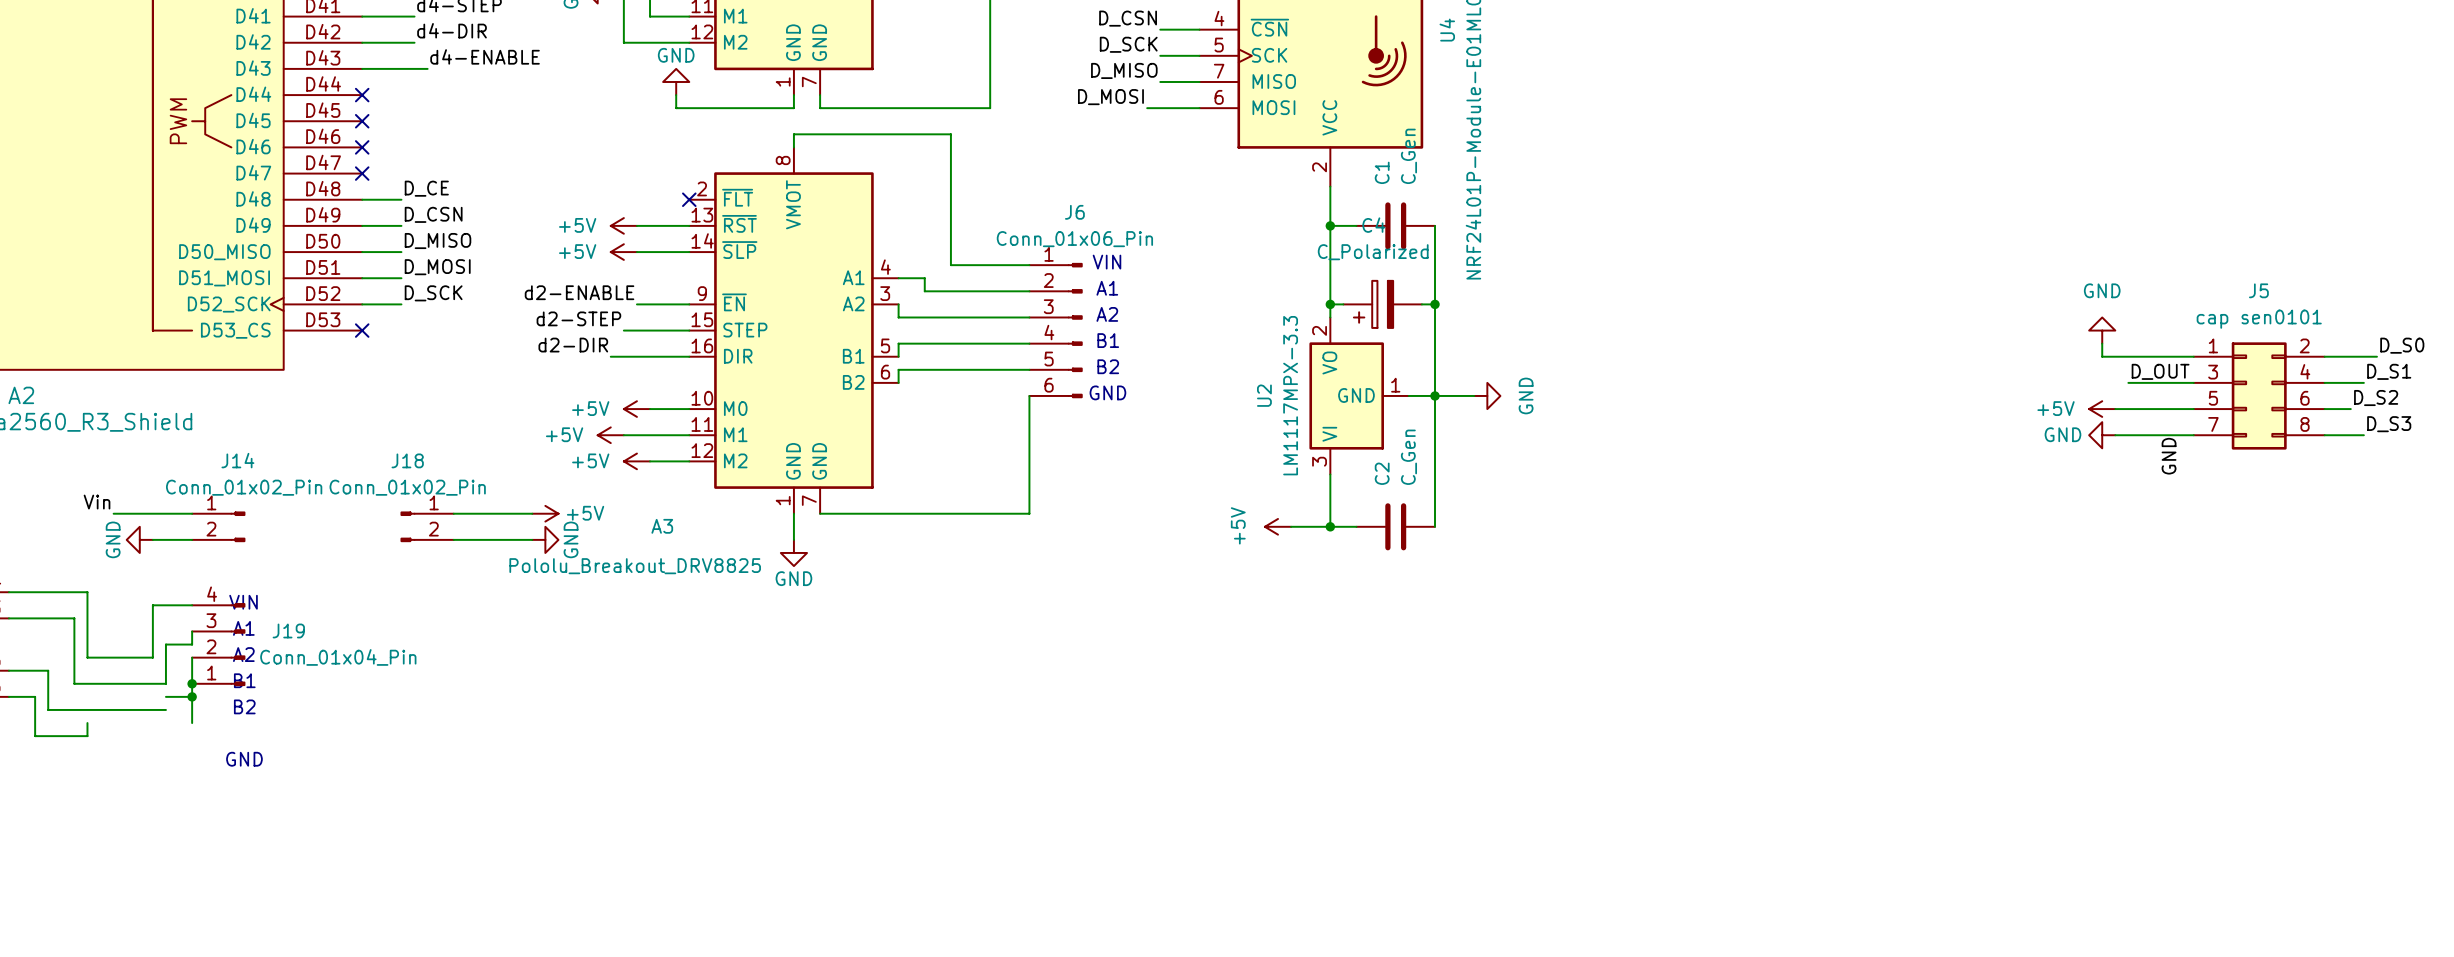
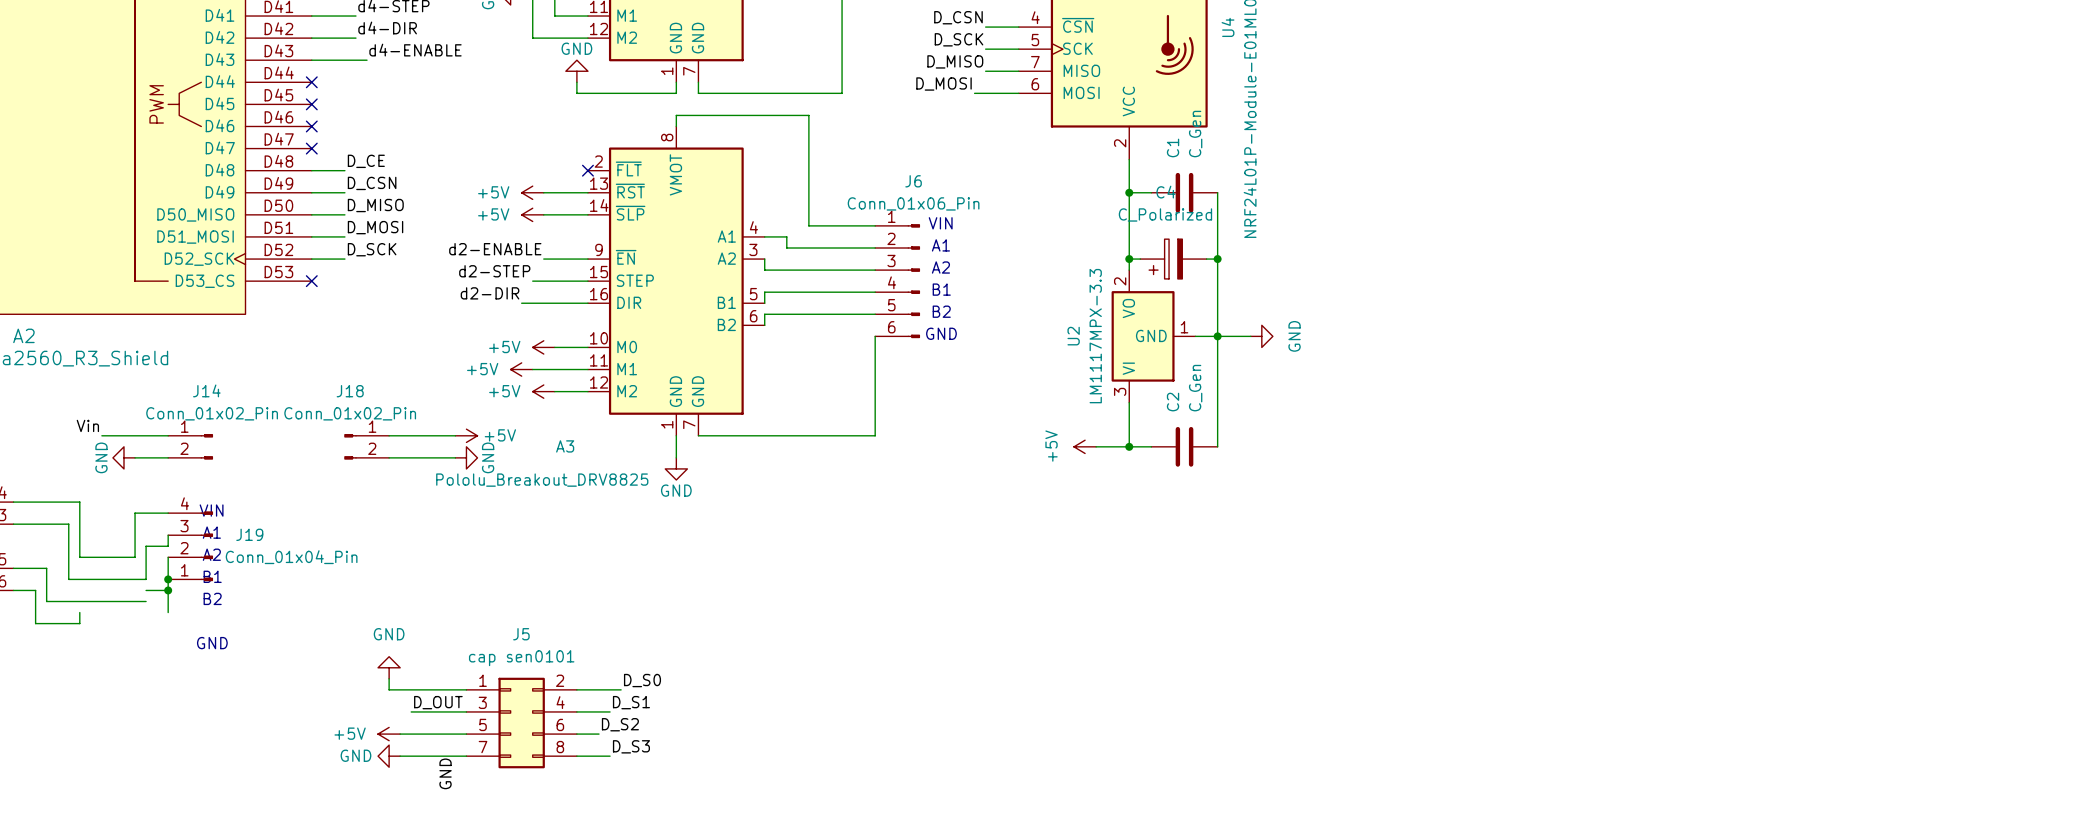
power symbol: GND (2102, 330) -> none
wire: (2102, 343) (2102, 356) (2193, 356) -> none
label: D_S0 (2402, 345) -> none
wire: (2324, 356) (2376, 356) -> none
label: D_OUT (2160, 371) -> none
label: D_S1 (2389, 371) -> none
wire: (2128, 382) (2193, 382) -> none
wire: (2324, 382) (2363, 382) -> none
J5 position: (2259, 395) -> (521, 723)
label: D_S2 (2376, 398) -> none
power symbol: +5V (2102, 409) -> none
wire: (2115, 409) (2193, 409) -> none
wire: (2324, 409) (2350, 409) -> none
label: D_S3 (2389, 424) -> none
power symbol: GND (2102, 435) -> none
wire: (2115, 435) (2193, 435) -> none
wire: (2324, 435) (2363, 435) -> none
label: GND (2169, 456) -> none
power symbol: none -> GND (389, 667)
wire: none -> (389, 678) (389, 689) (466, 689)
label: none -> D_S0 (642, 680)
wire: none -> (576, 689) (621, 689)
label: none -> D_OUT (438, 702)
label: none -> D_S1 (631, 702)
wire: none -> (411, 711) (466, 711)
wire: none -> (576, 711) (610, 711)
label: none -> D_S2 (620, 724)
power symbol: none -> +5V (389, 734)
wire: none -> (400, 734) (466, 734)
wire: none -> (576, 734) (599, 734)
label: none -> D_S3 (631, 746)
power symbol: none -> GND (389, 756)
wire: none -> (400, 756) (466, 756)
wire: none -> (576, 756) (610, 756)
label: none -> GND (445, 773)

